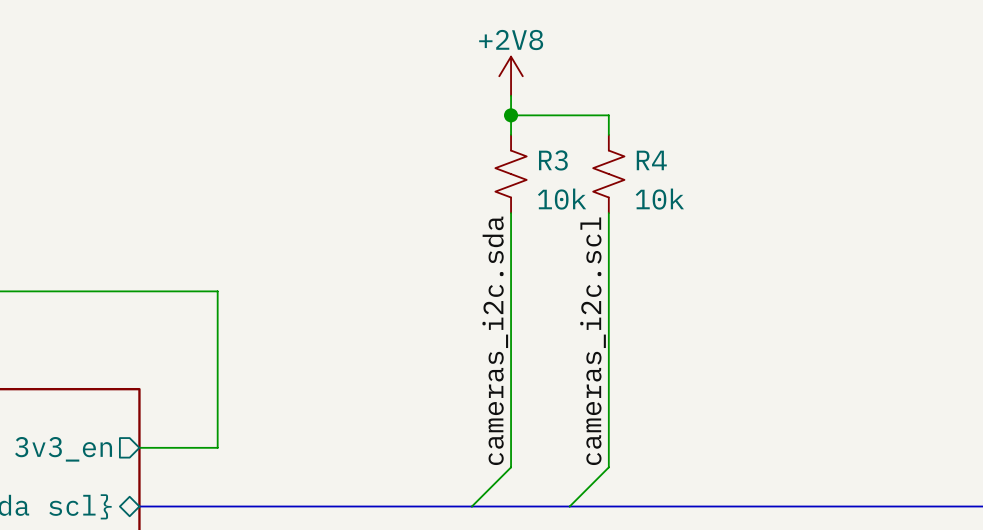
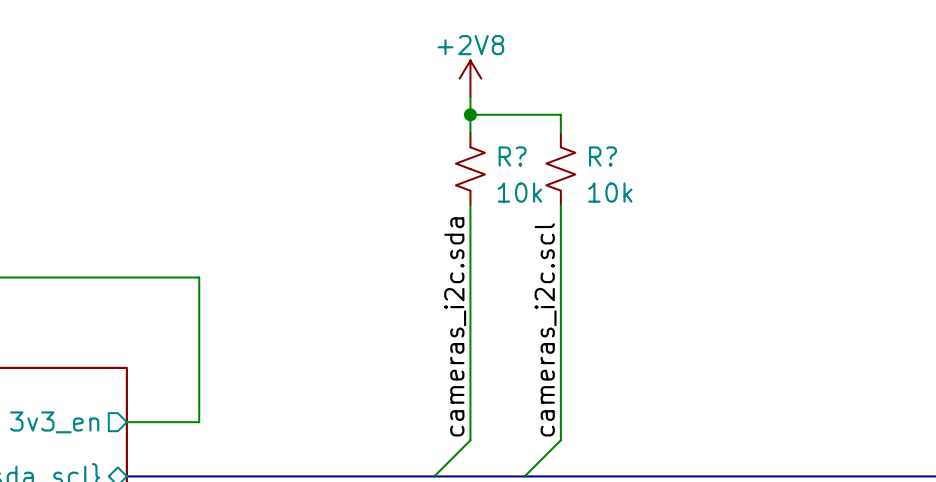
R3 name: R3 (553, 160) -> R? (512, 156)
R4 name: R4 (651, 160) -> R? (603, 156)

